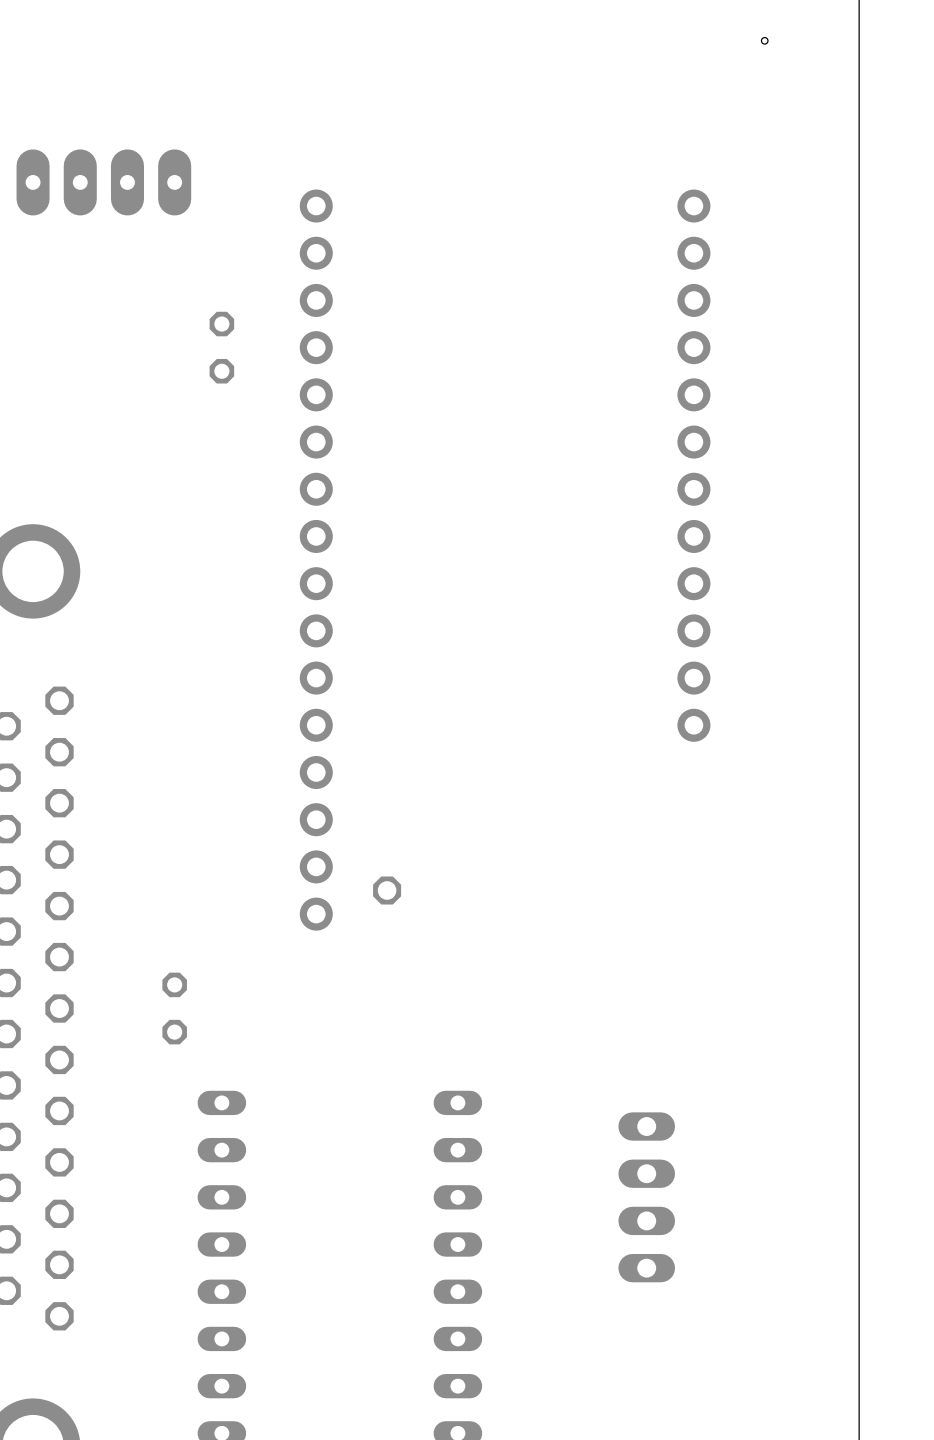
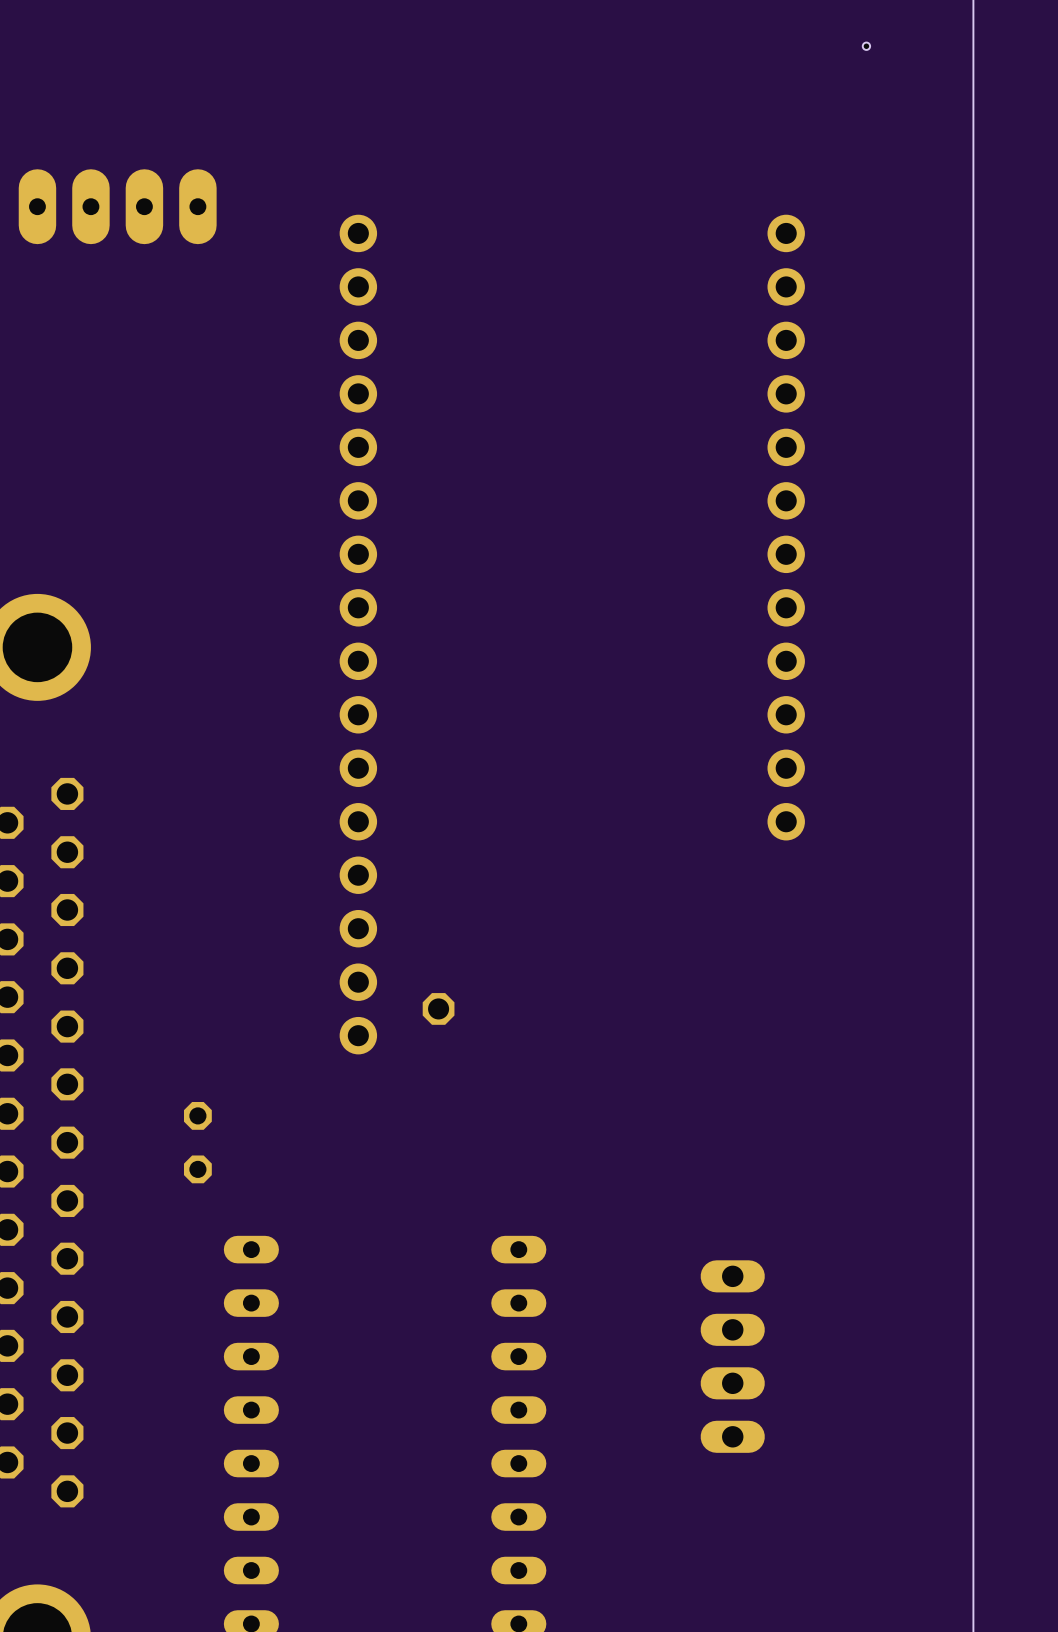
part: (221, 347) -> none

